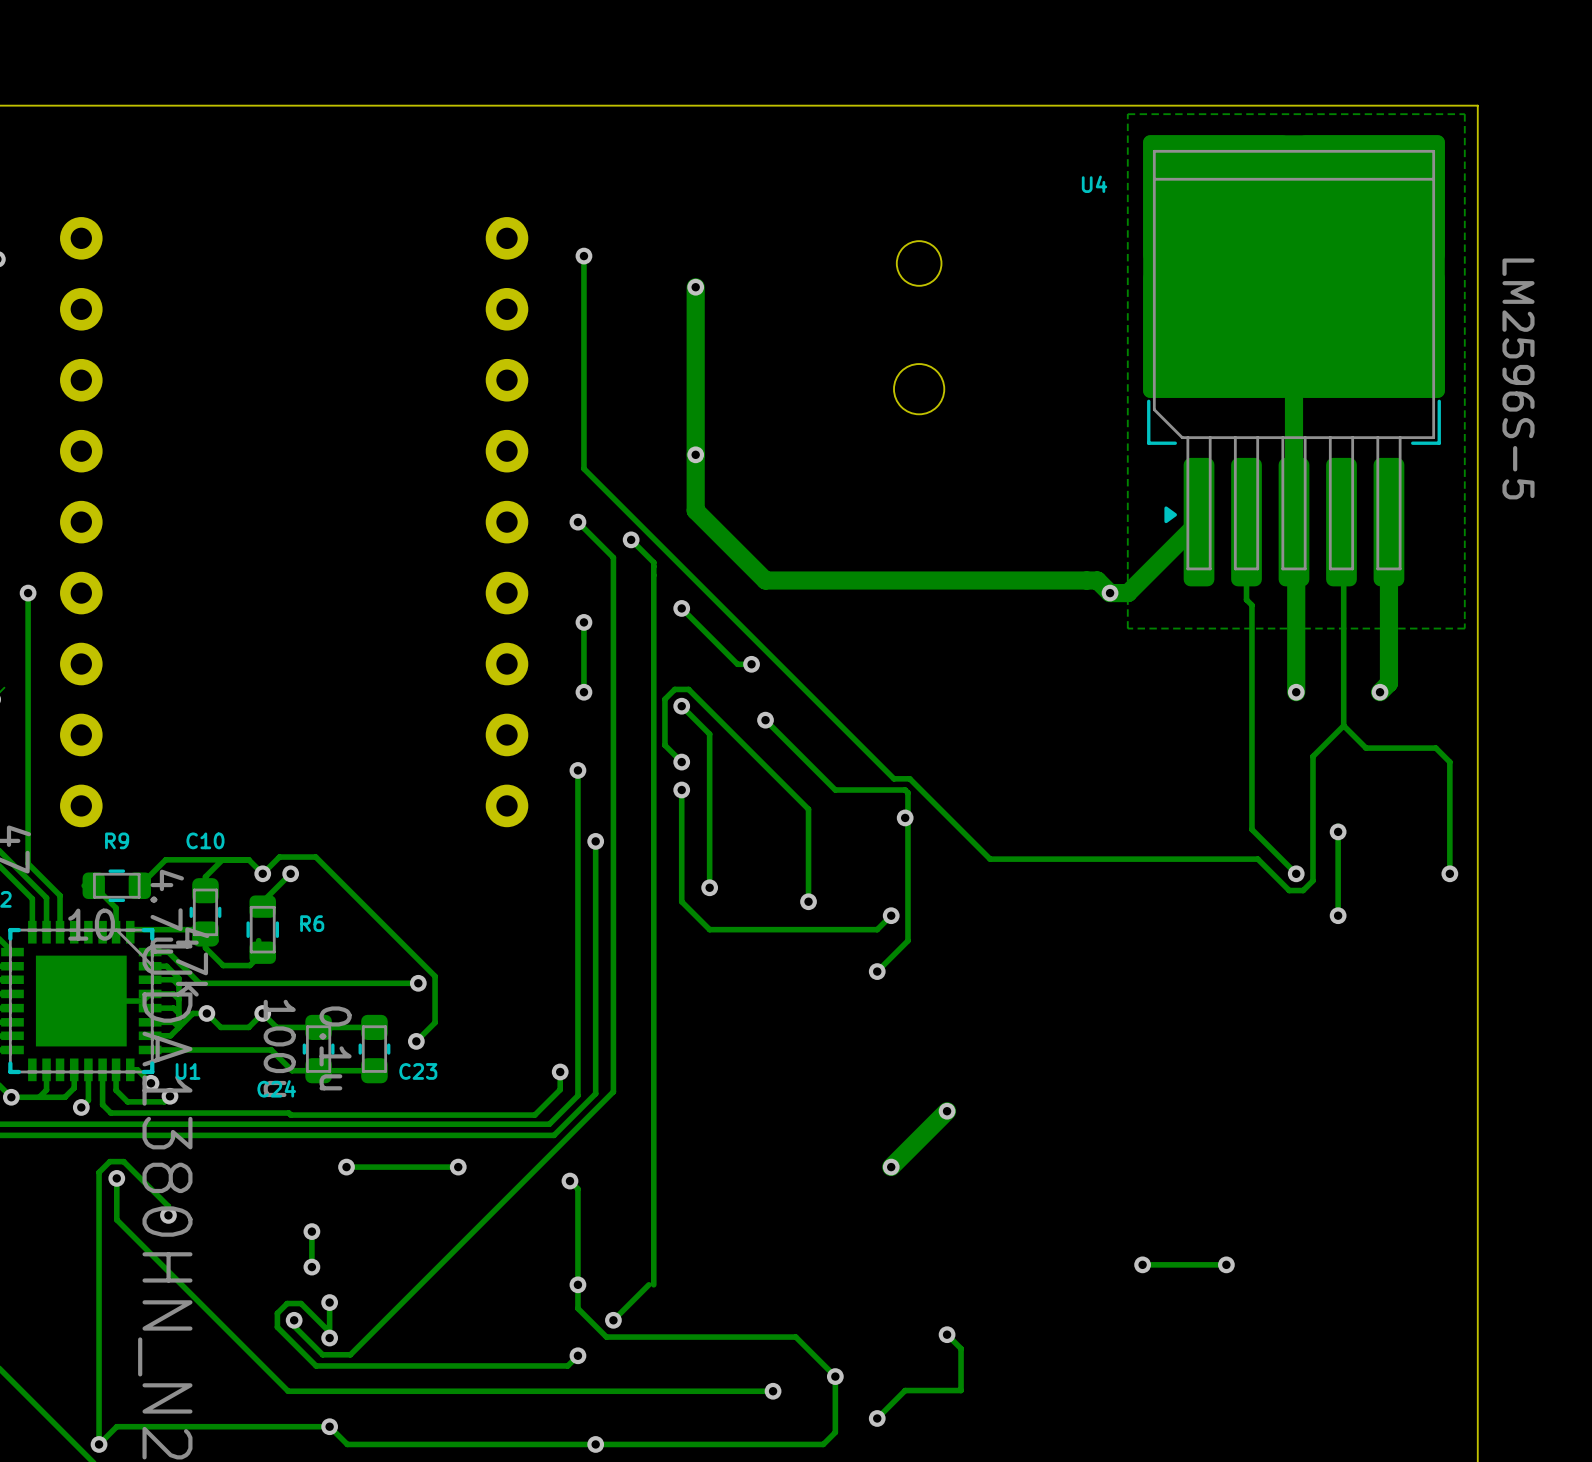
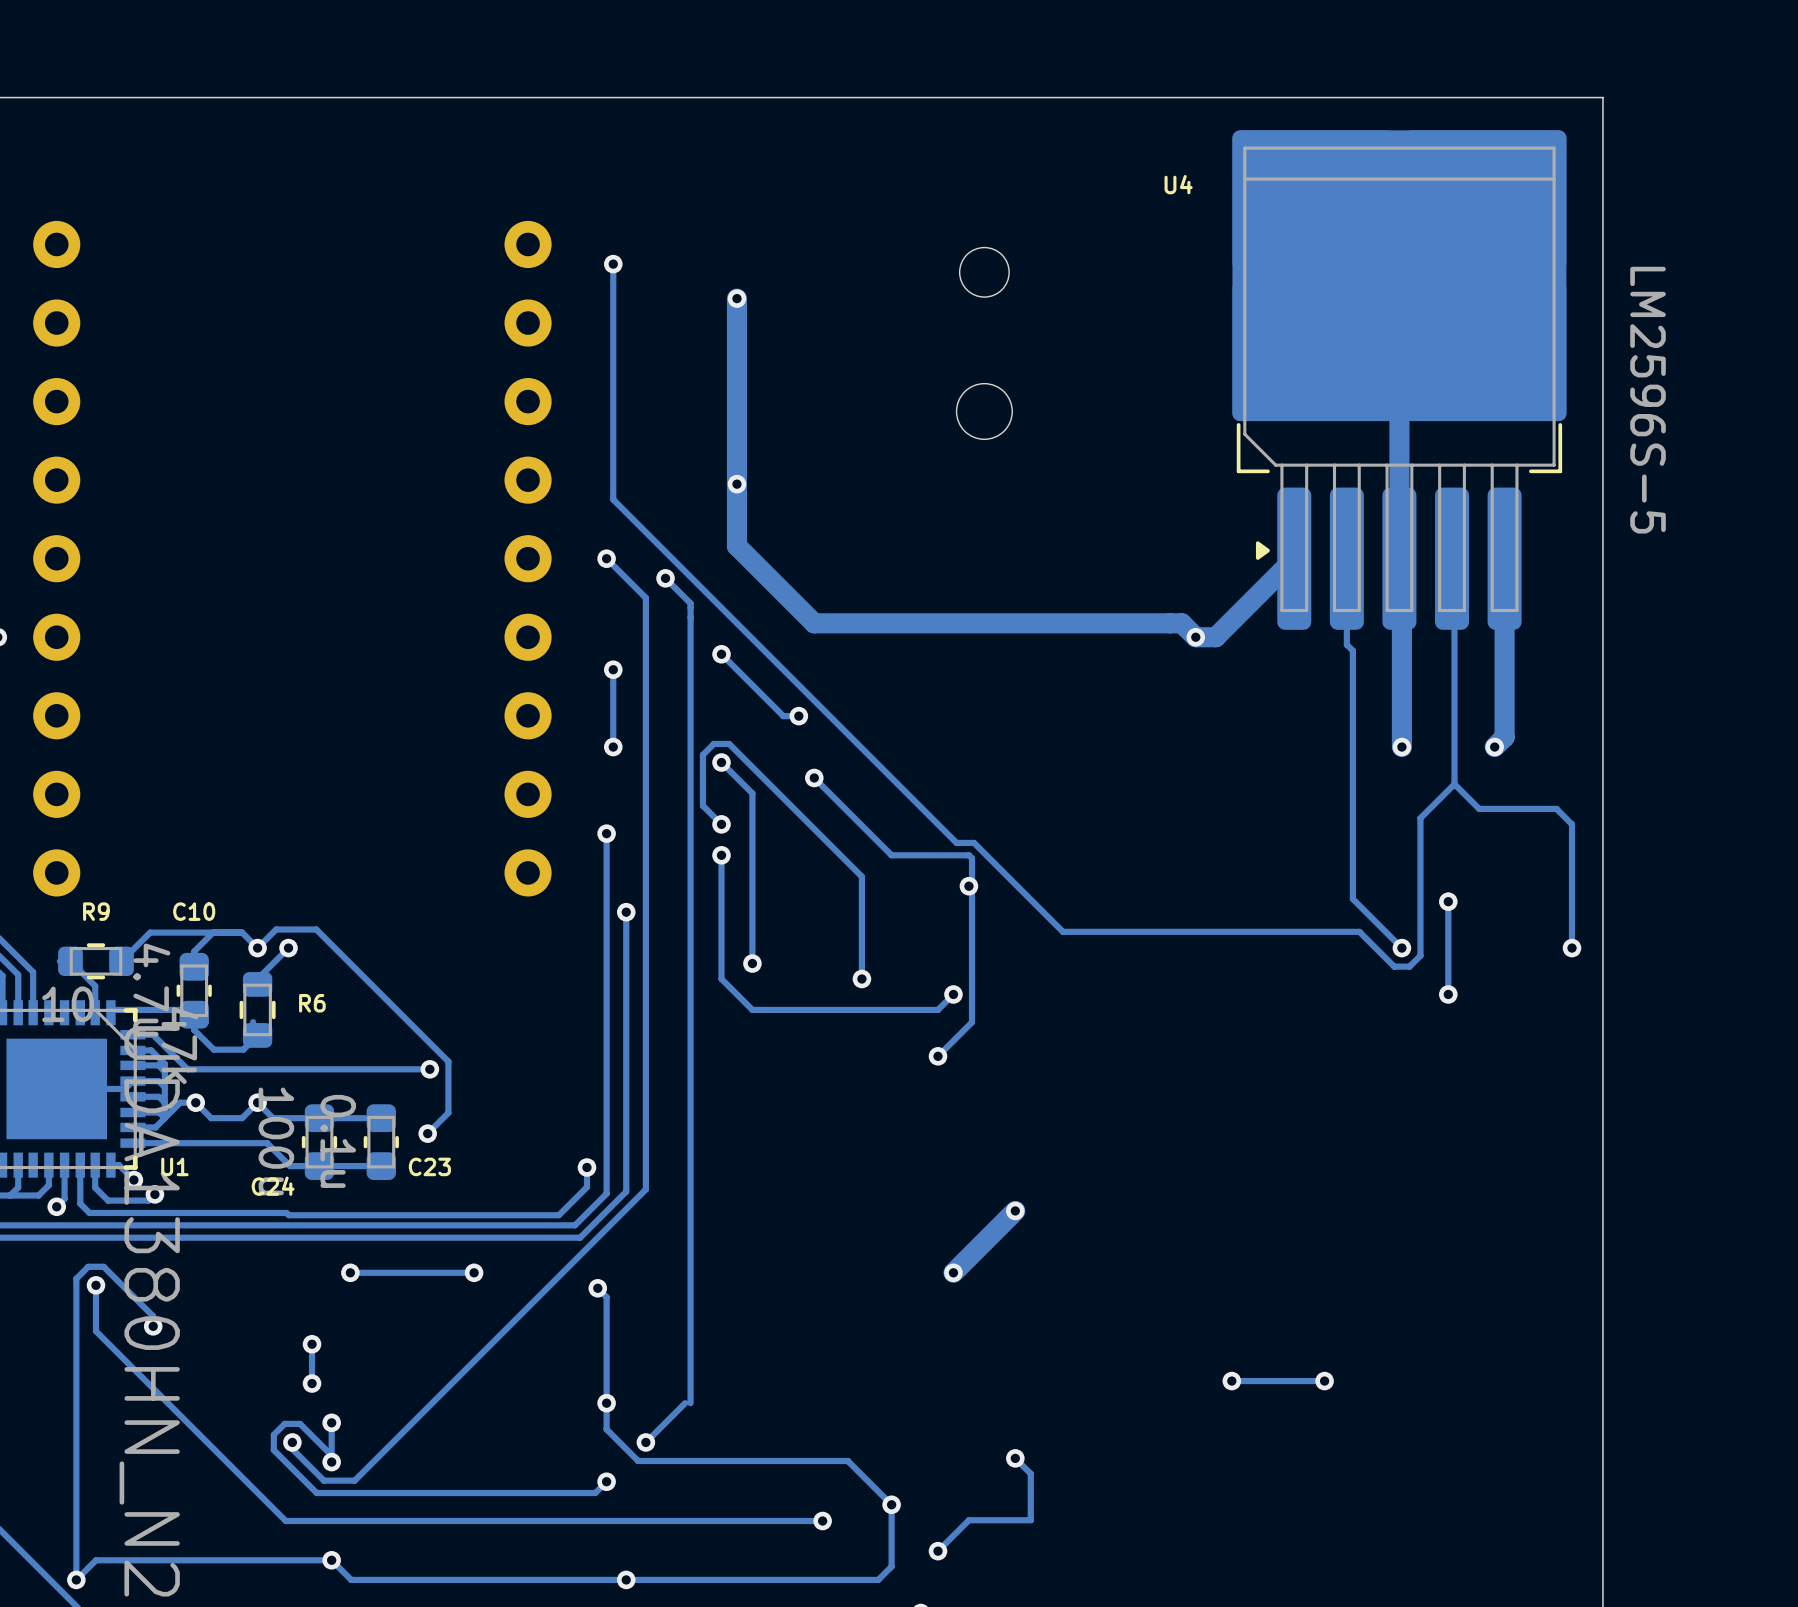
zone outline: (1464, 114) (1464, 628) (1127, 628) (1127, 114) (1464, 114) -> none

